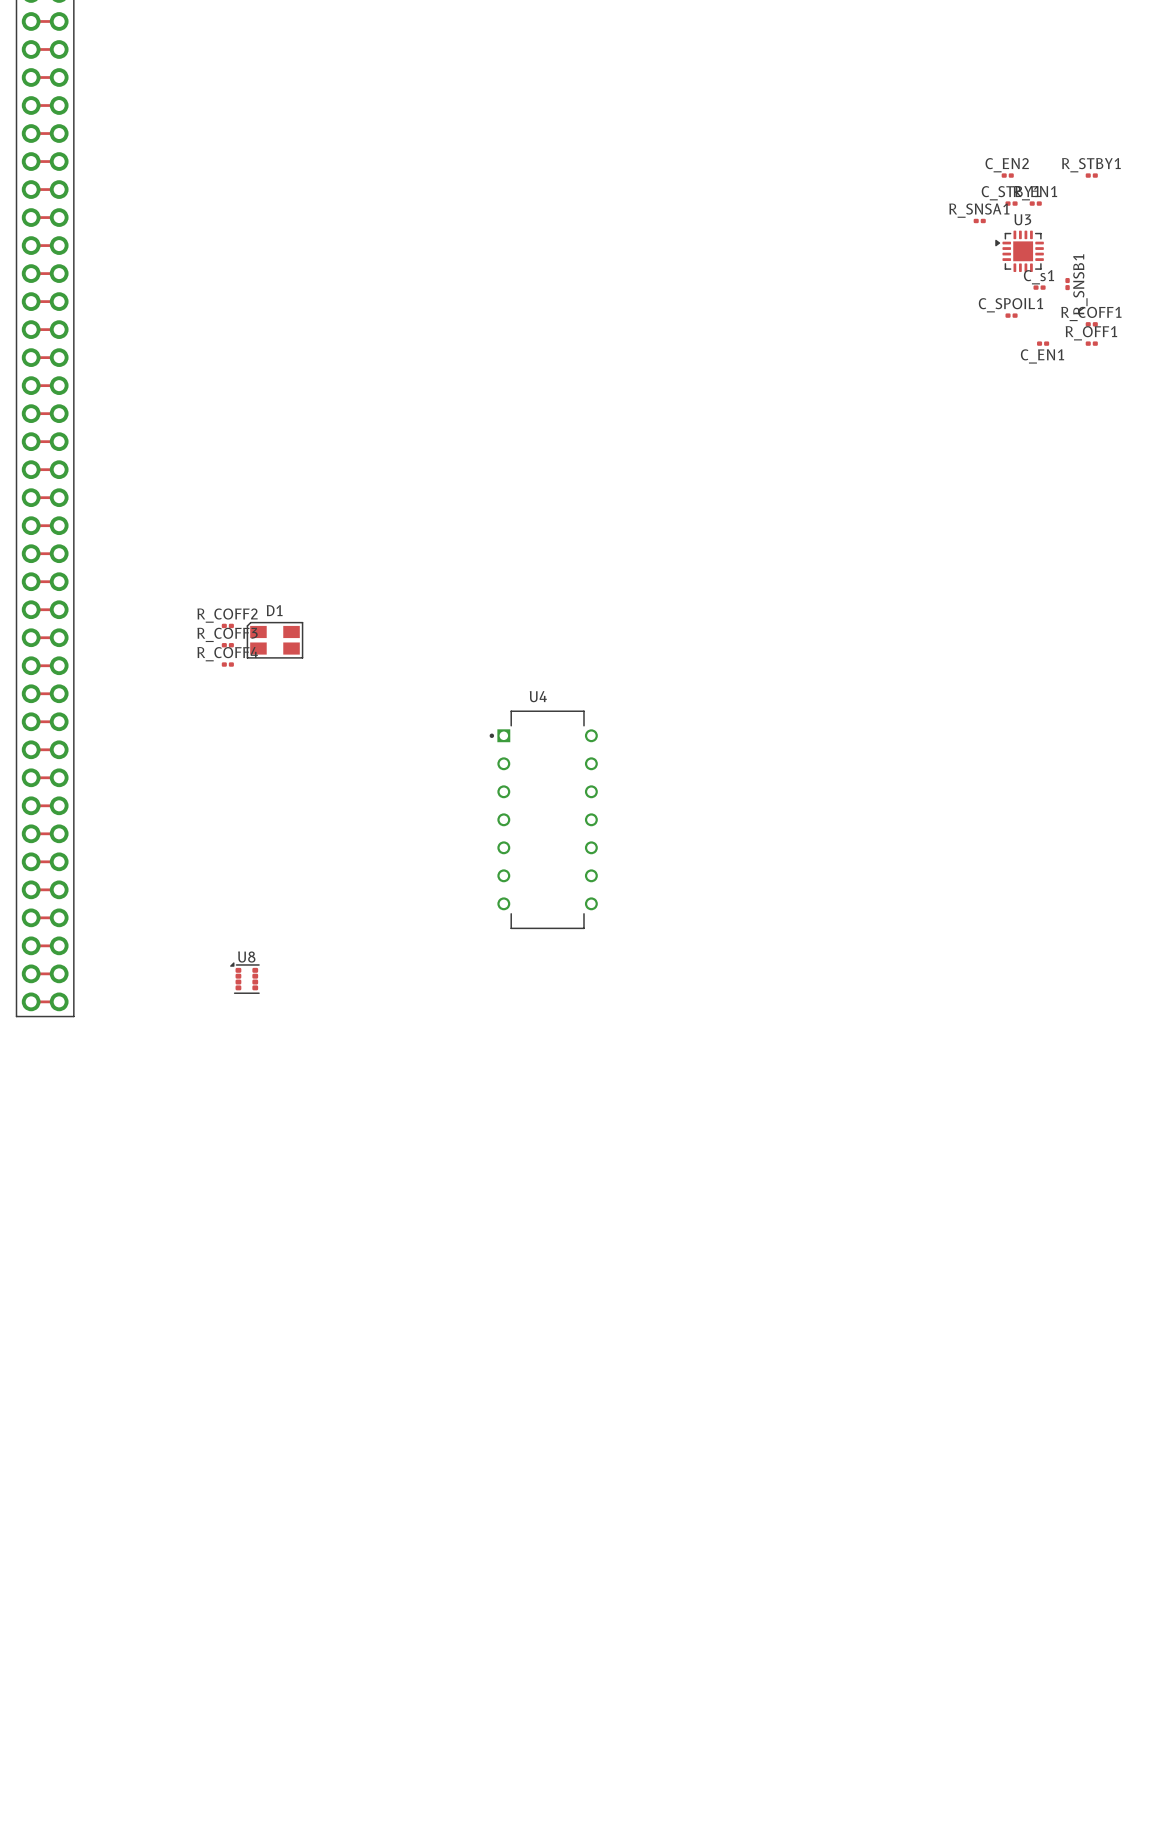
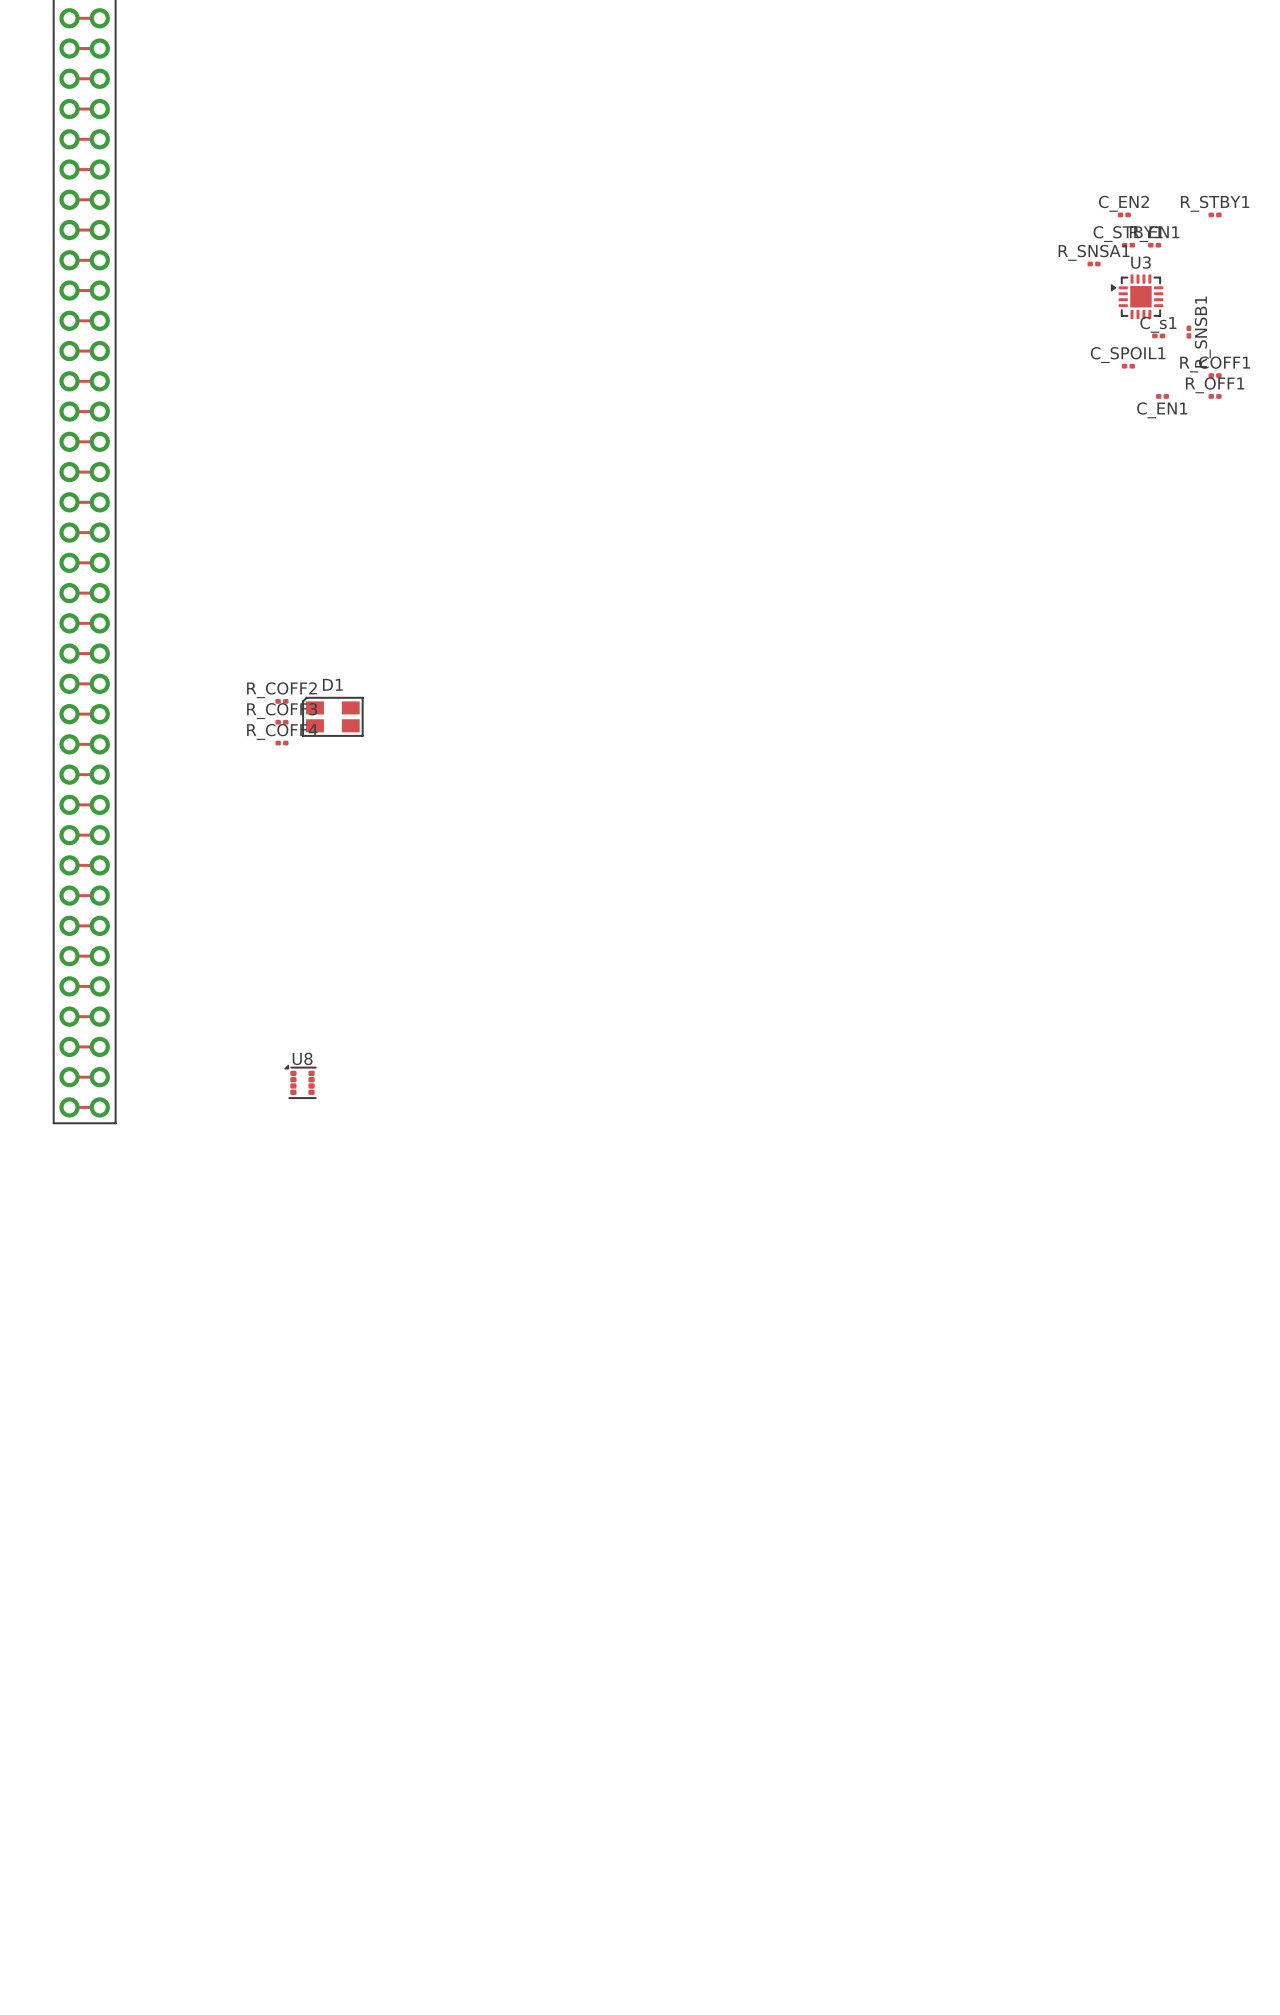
U4: (543, 819) -> none

